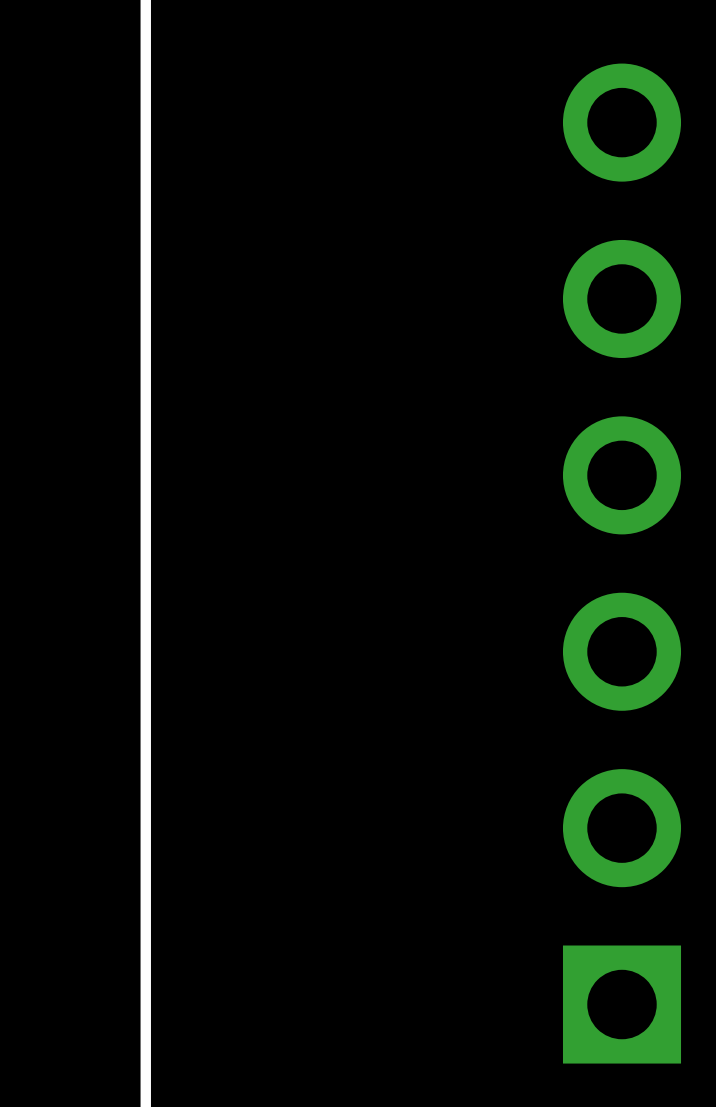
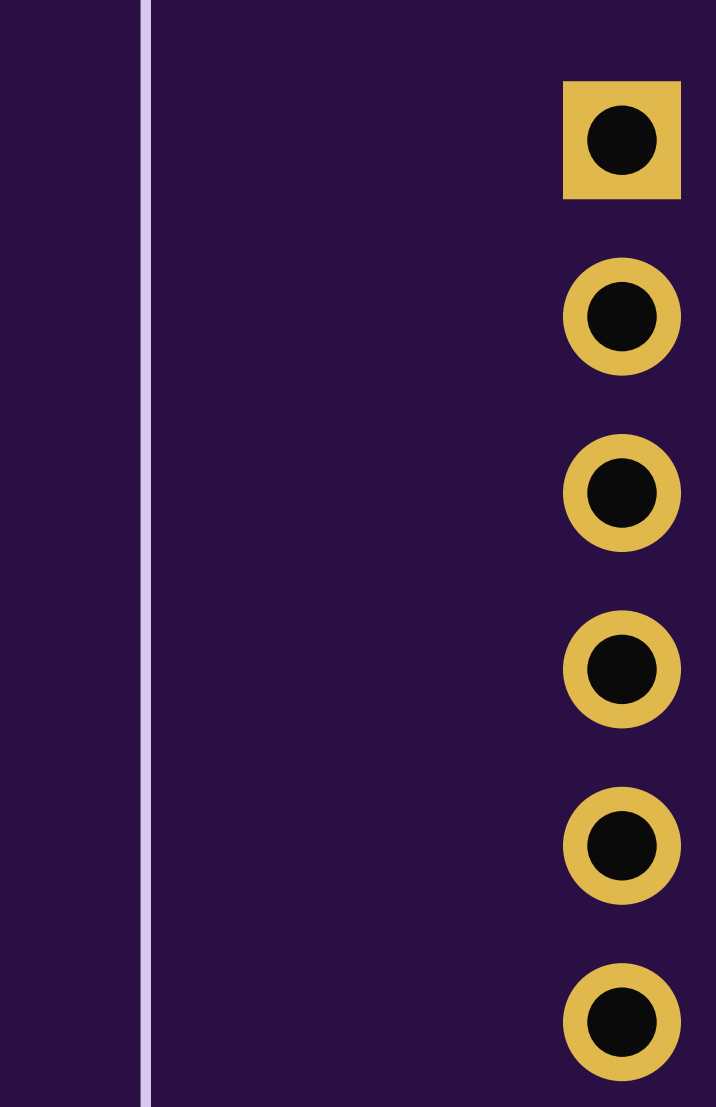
part rotation: 0° (622, 563) -> 180° (622, 581)

